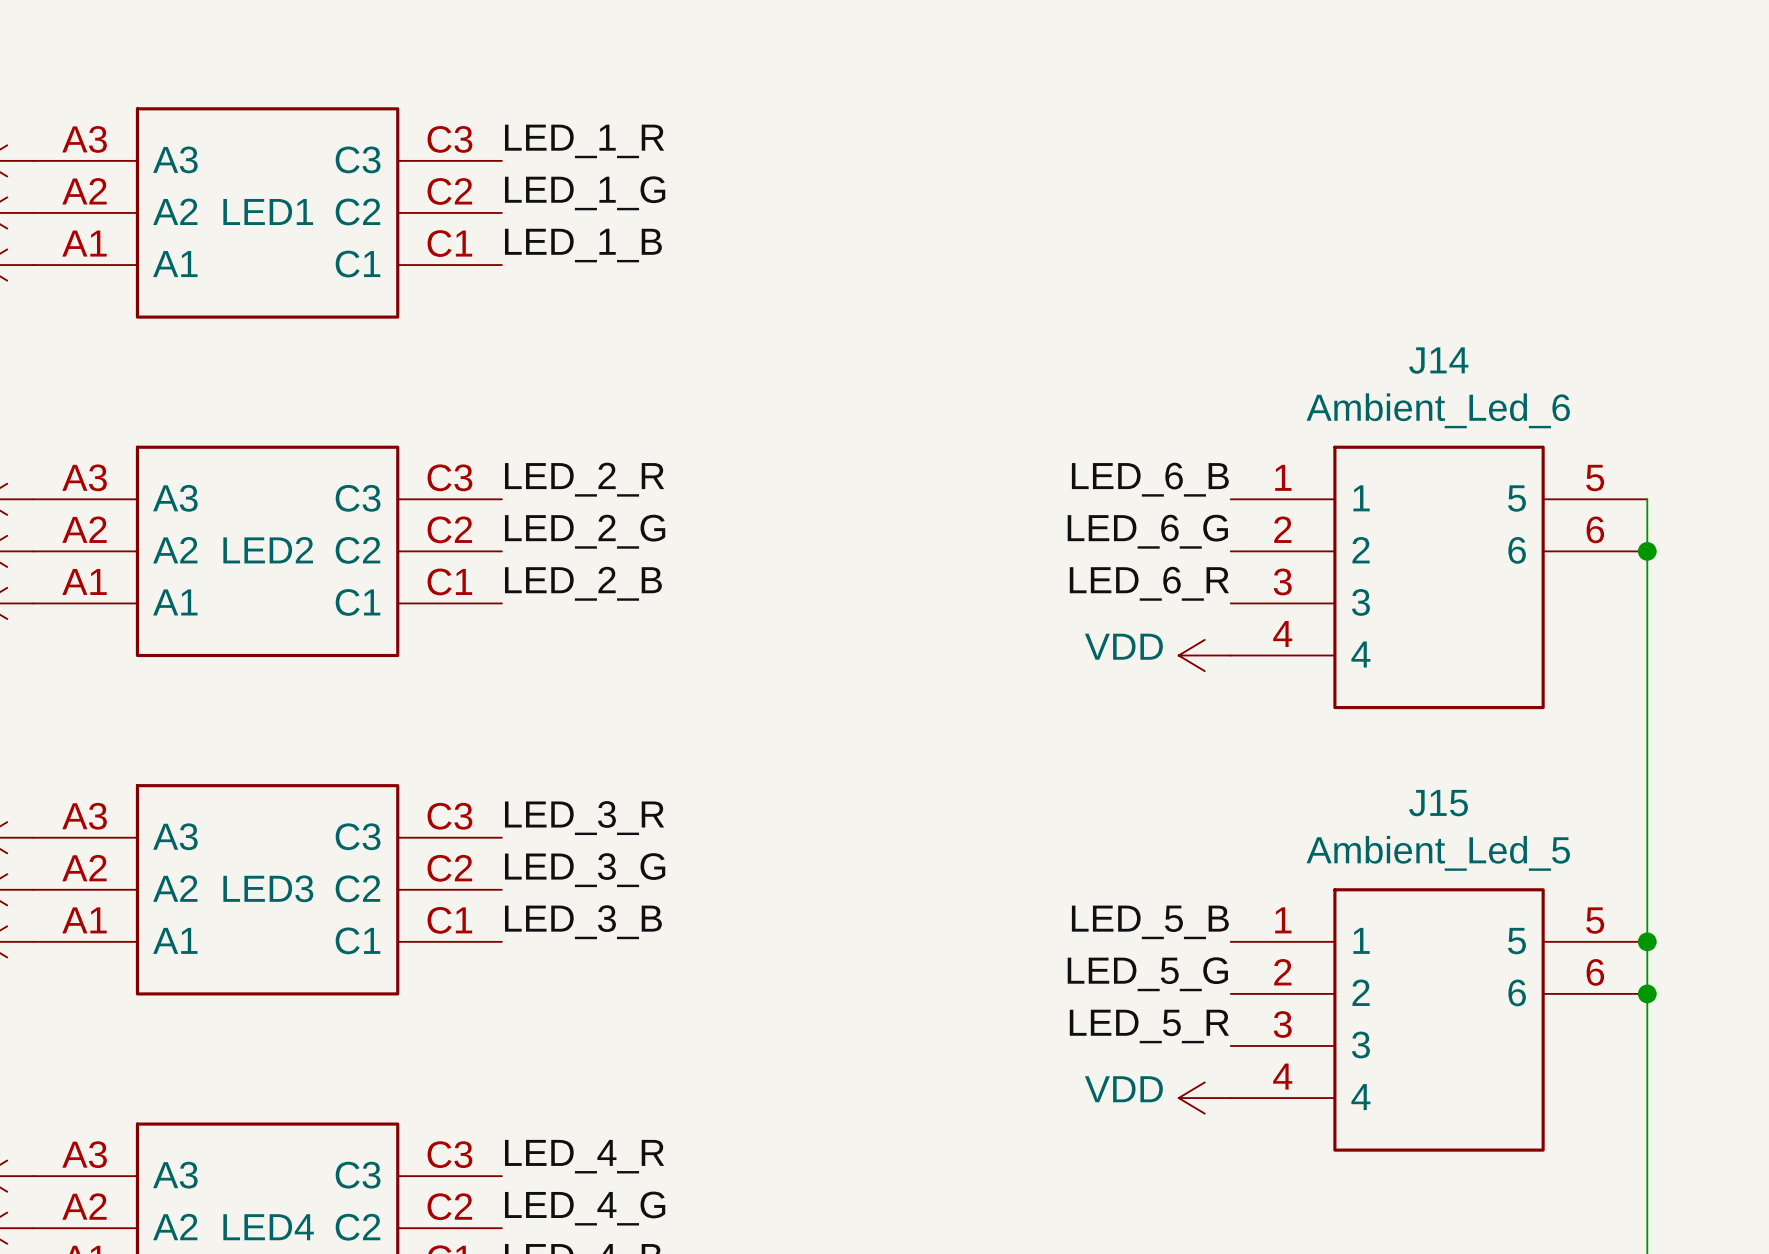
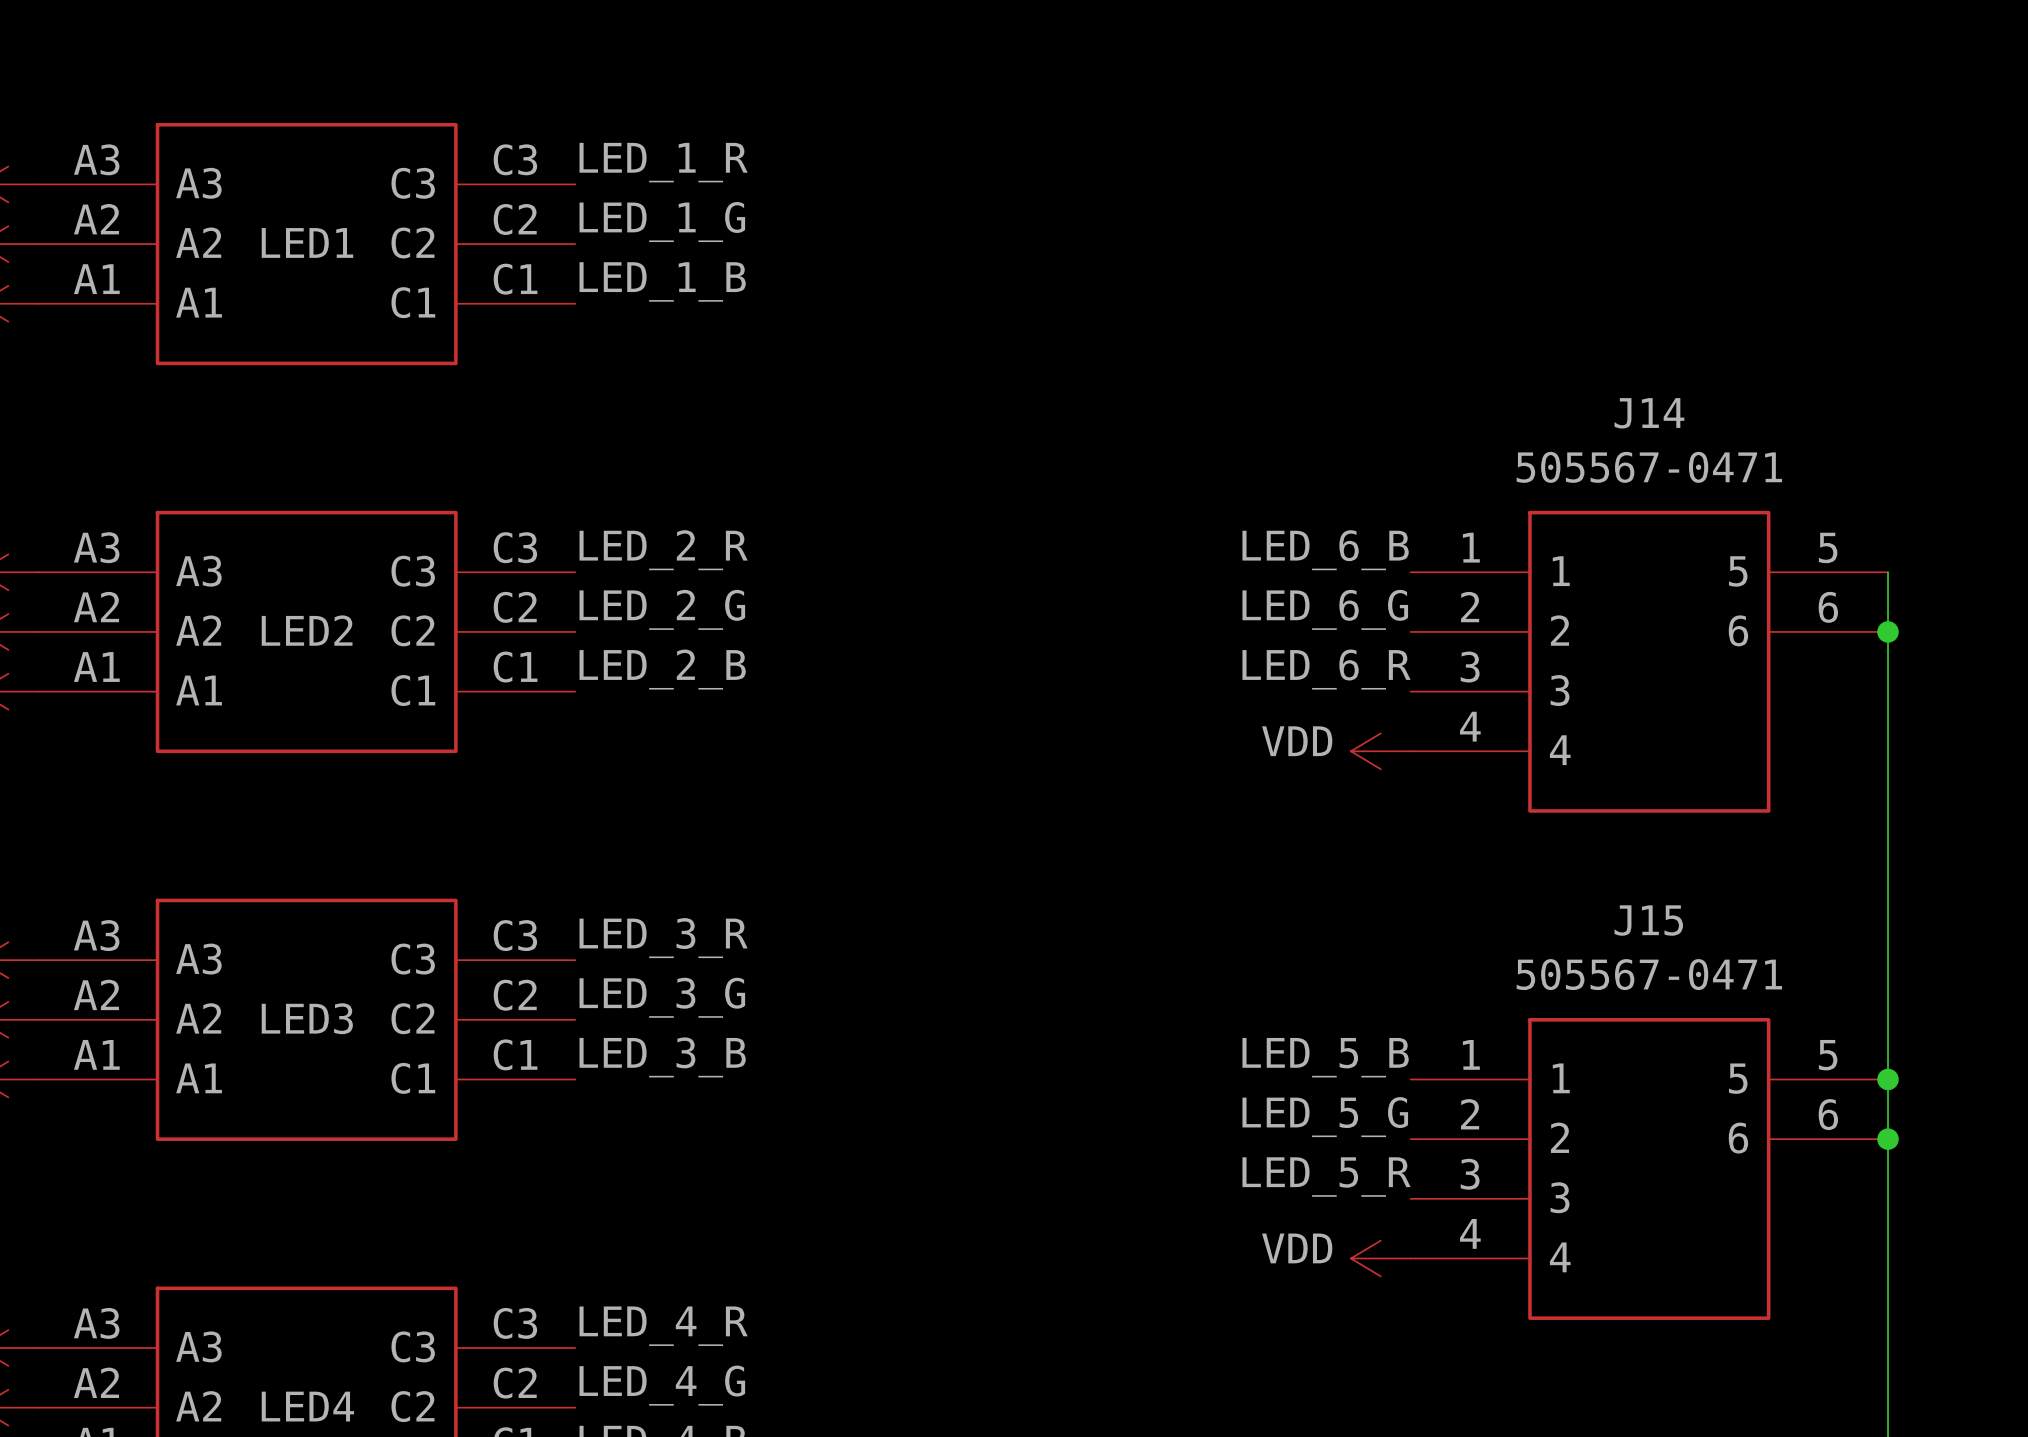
J14 value: Ambient_Led_6 (1438, 410) -> 505567-0471 (1649, 467)
J15 value: Ambient_Led_5 (1438, 853) -> 505567-0471 (1649, 974)

